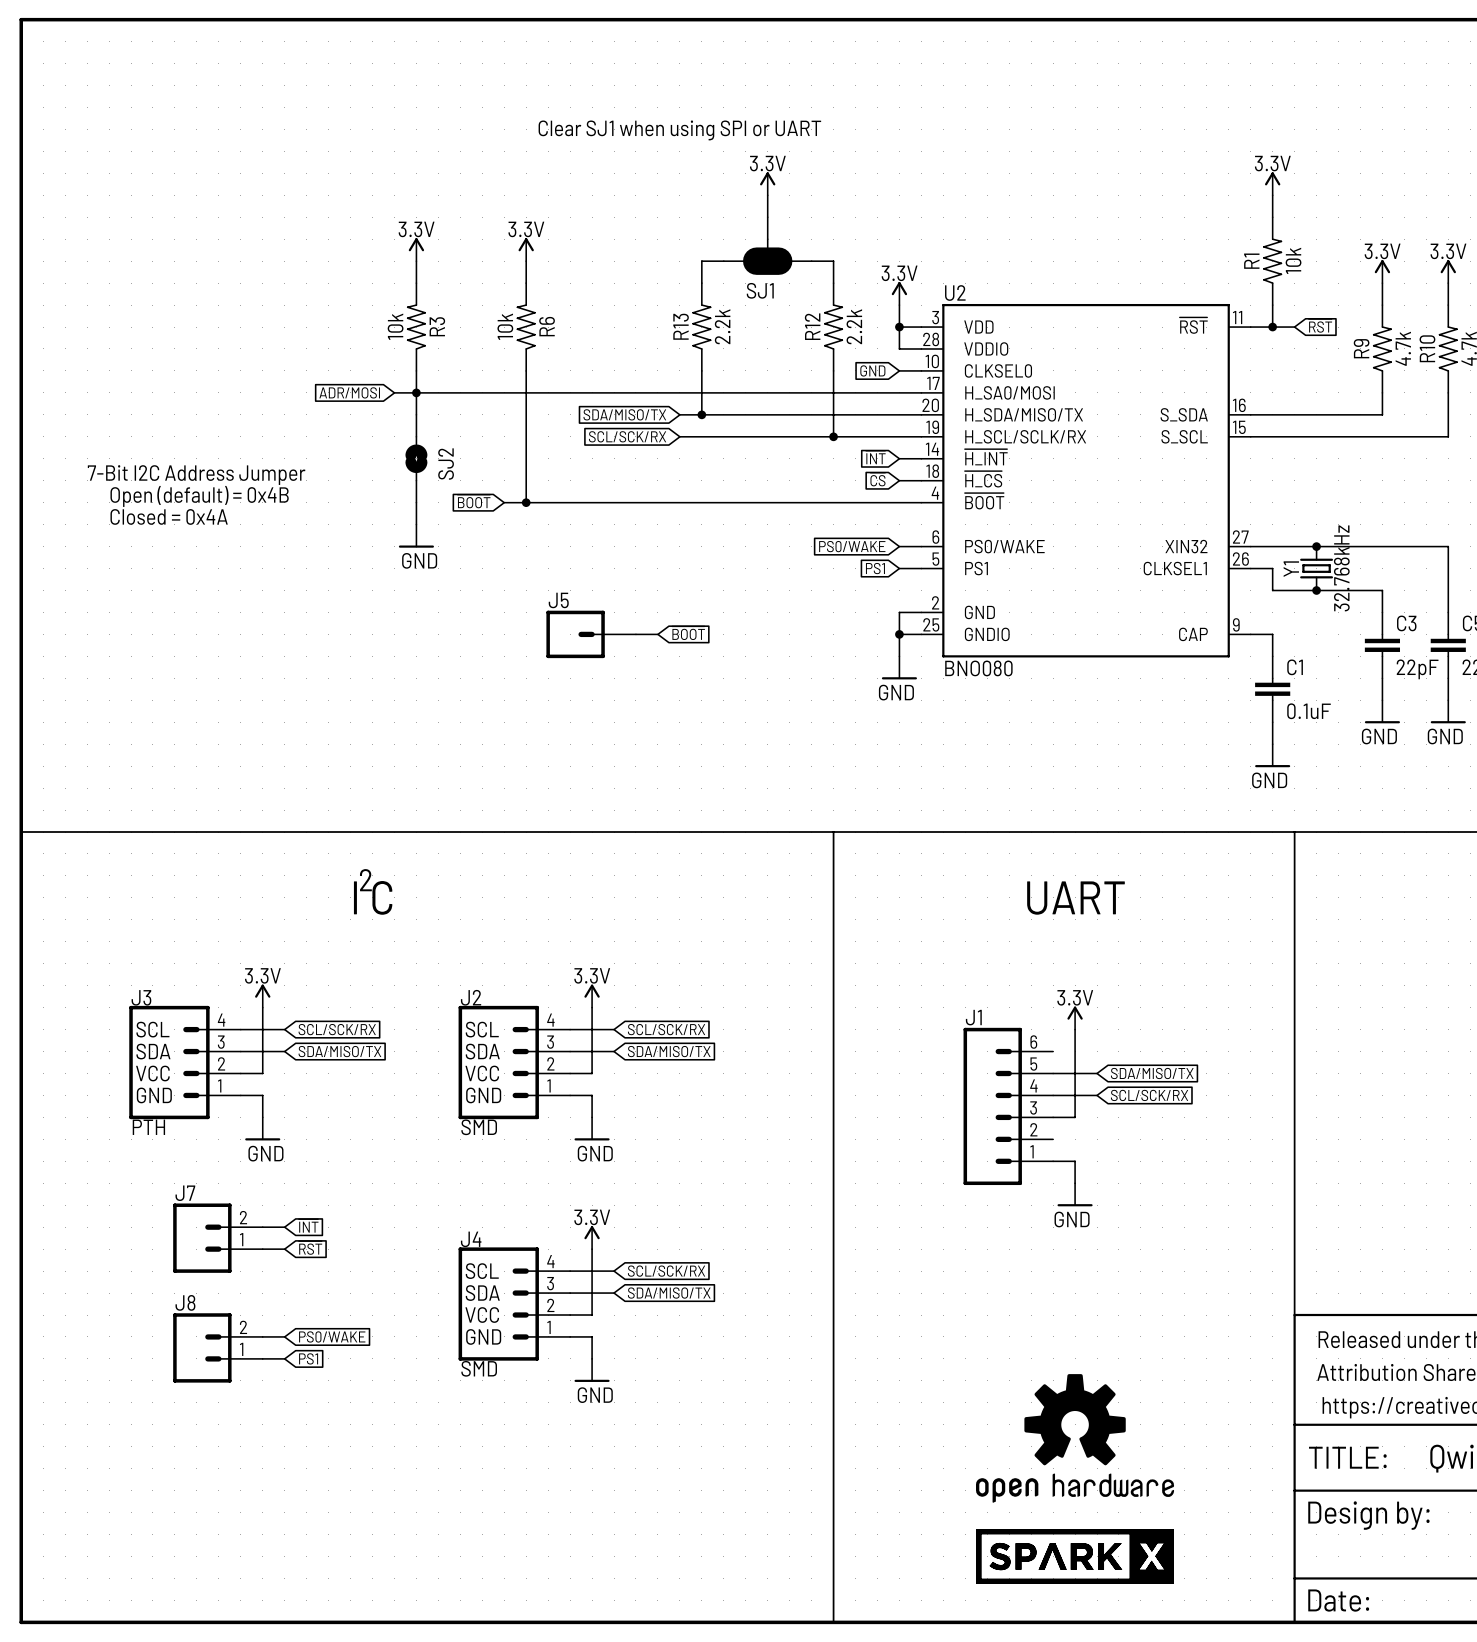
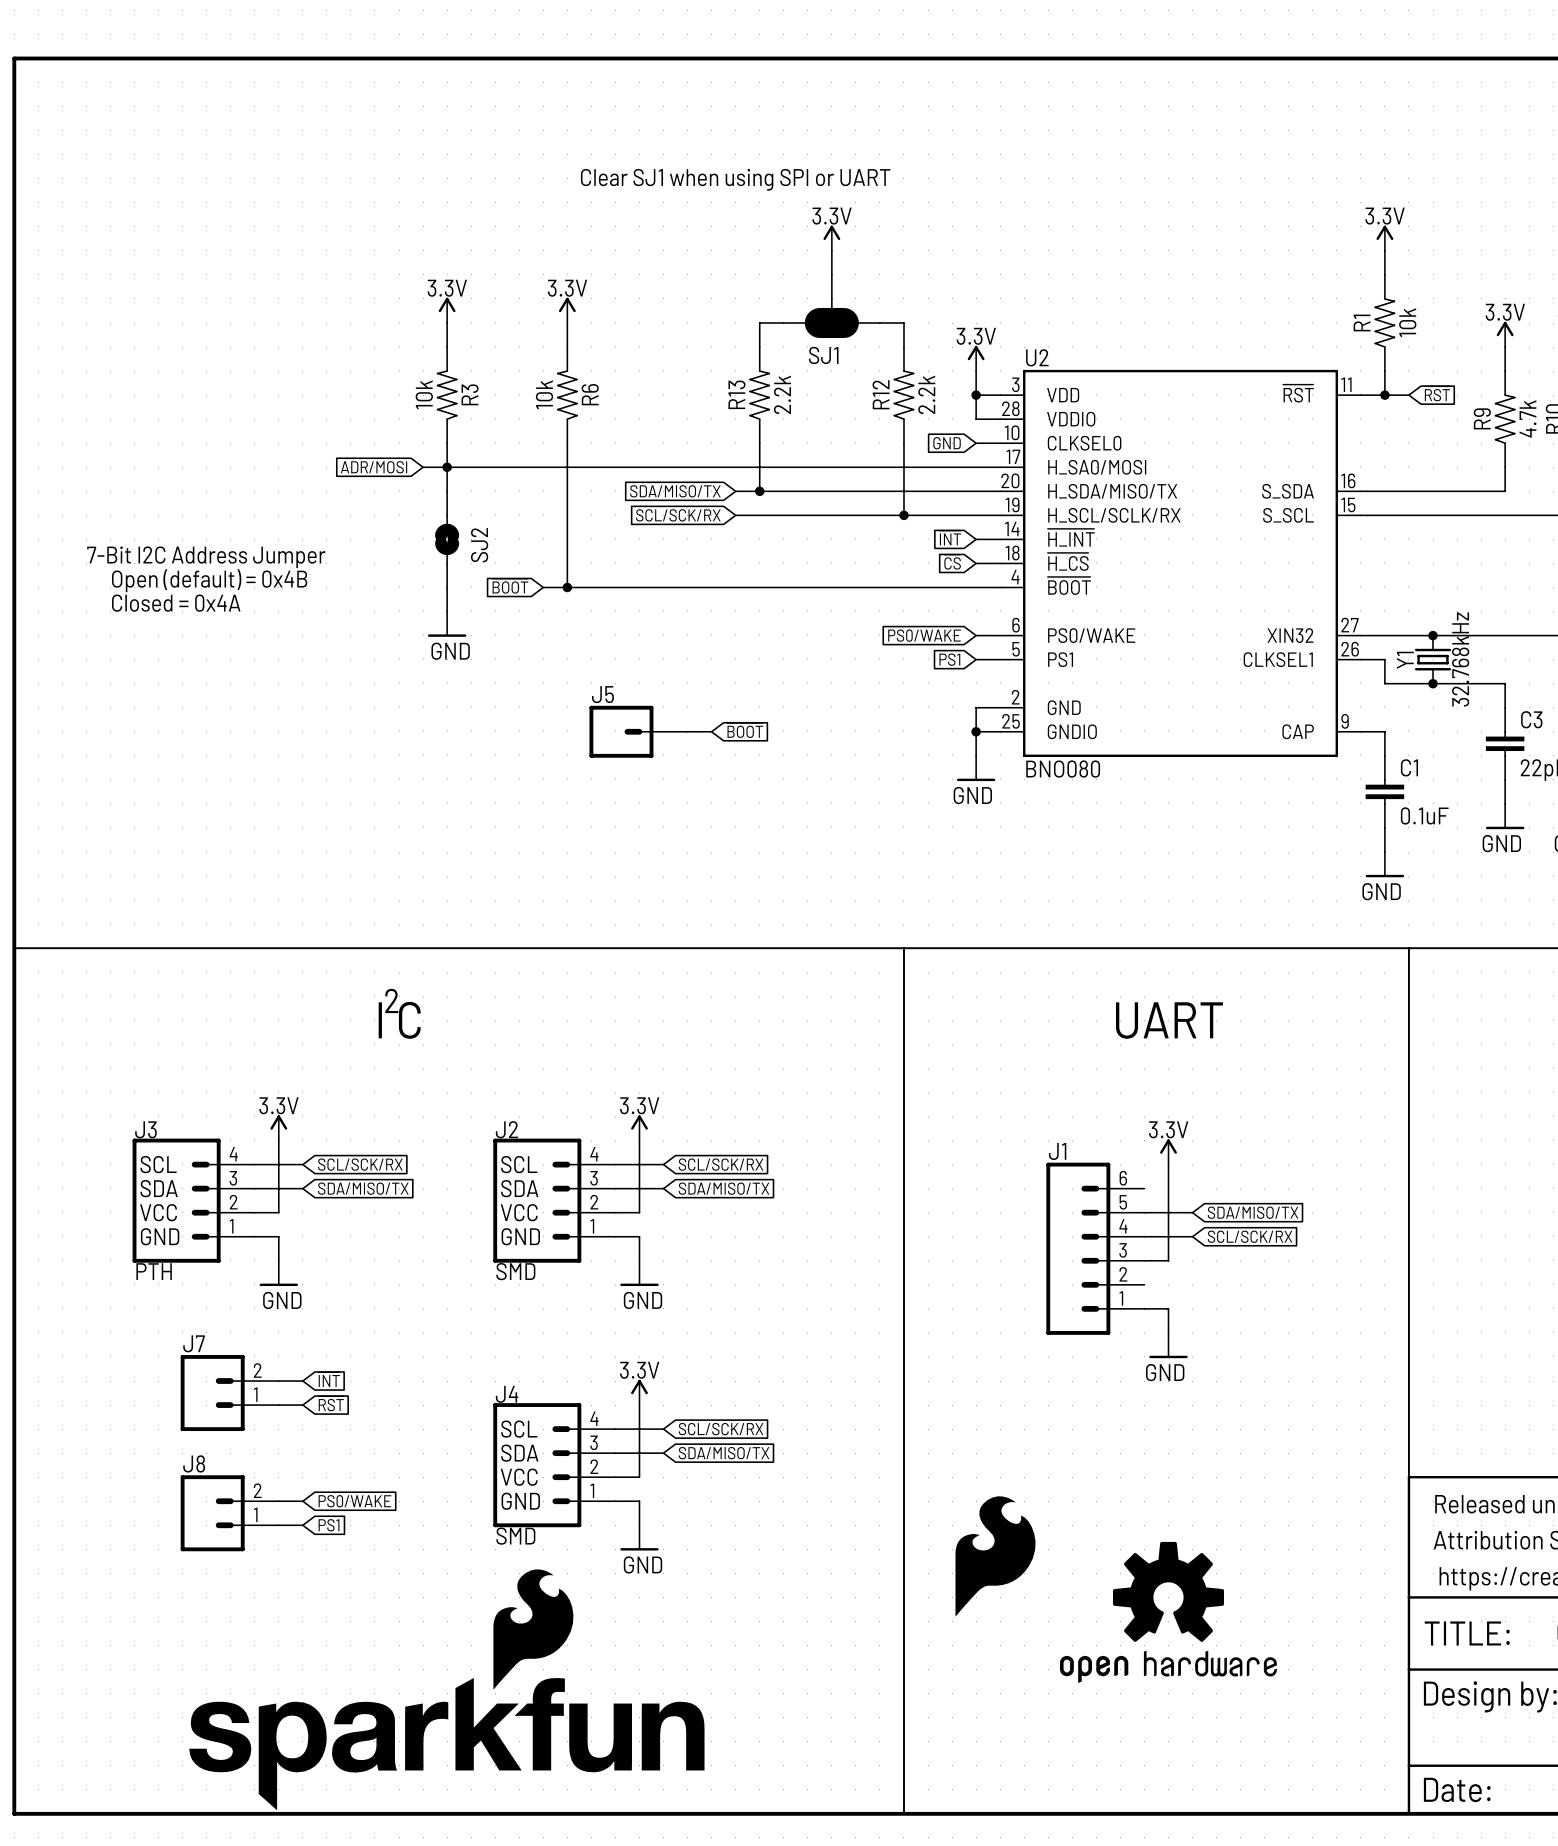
part: none -> (995, 1556)
part: none -> (446, 1689)
part: (1075, 1556) -> none

